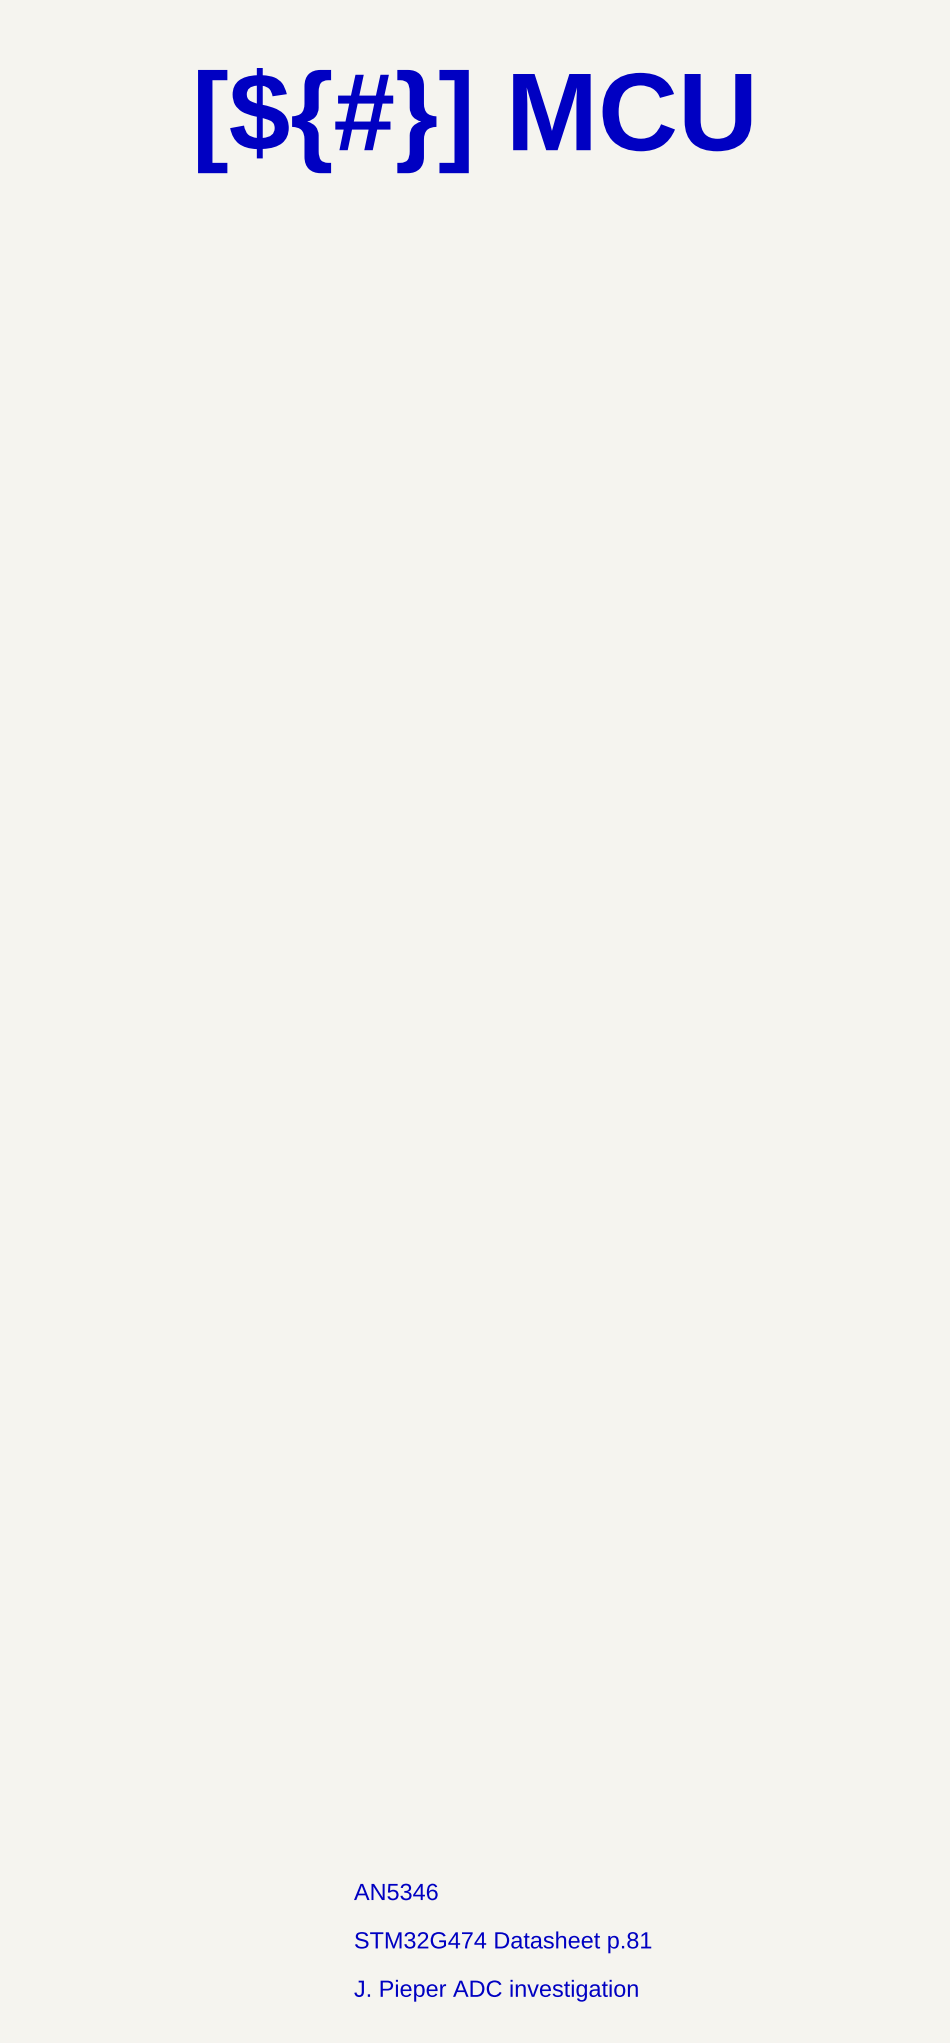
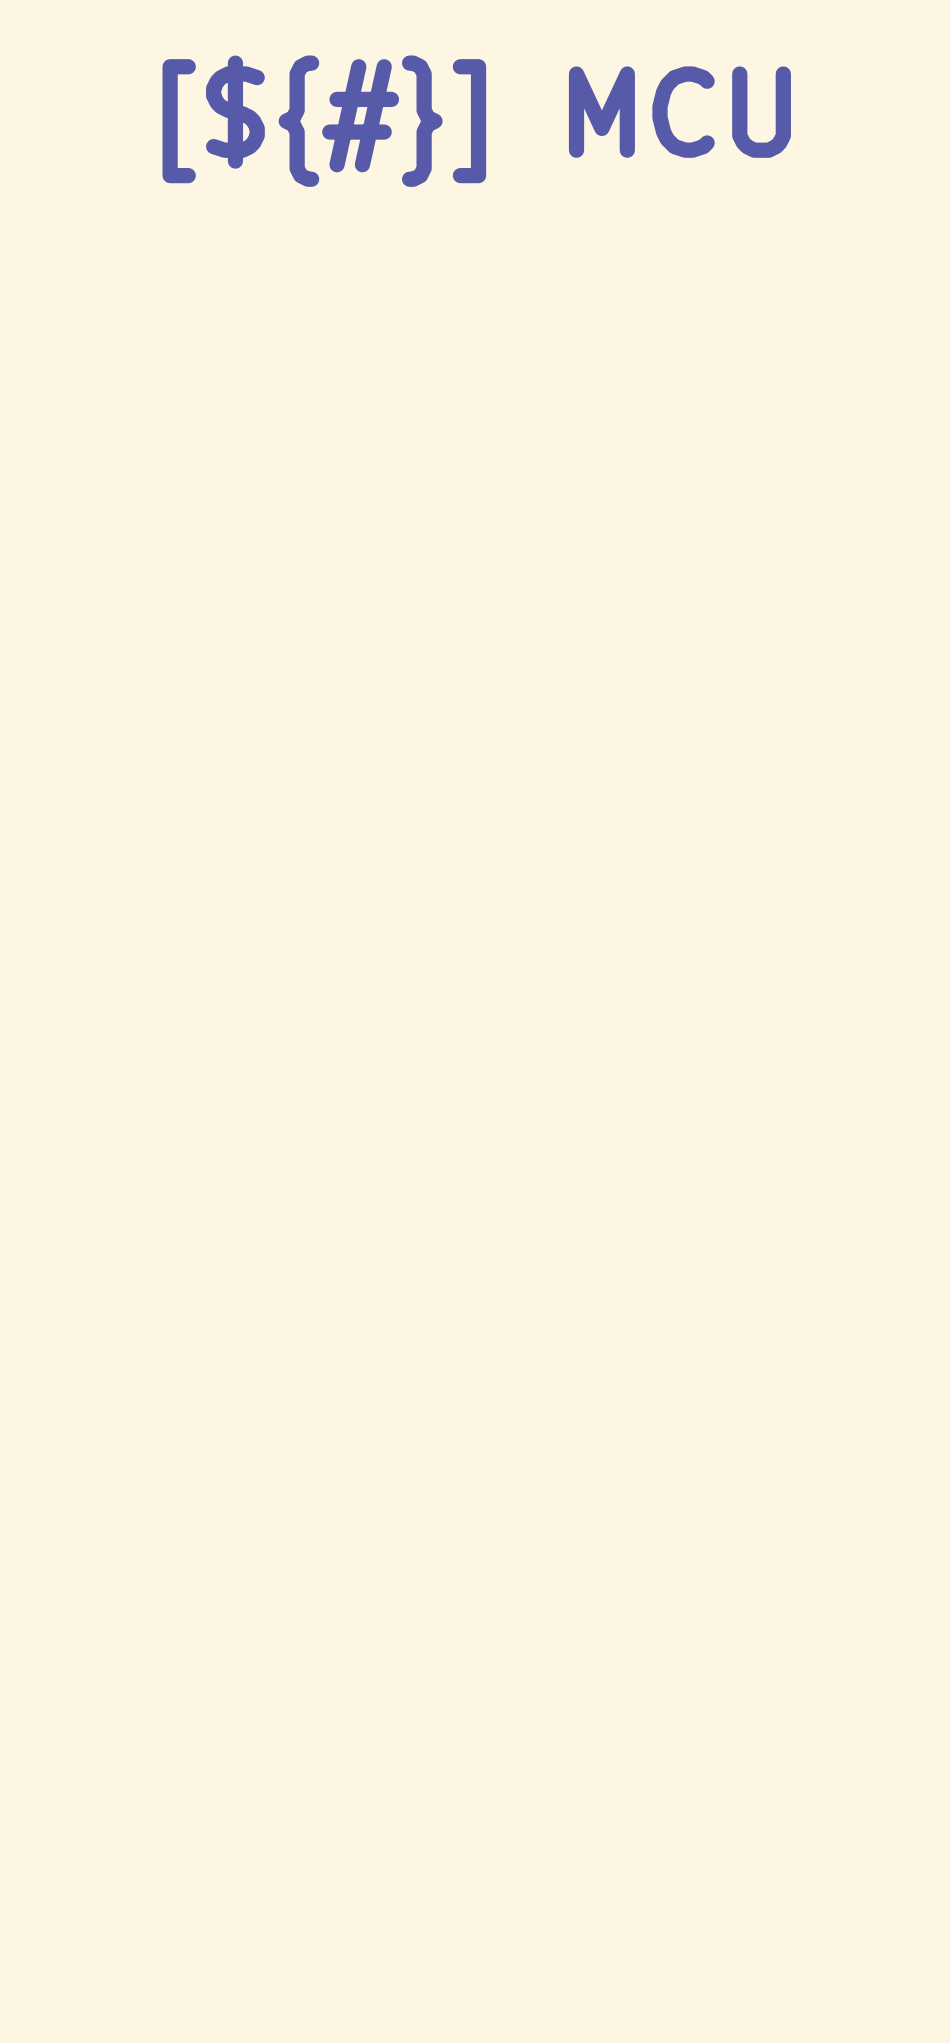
text: AN5346 (395, 1891) -> none
text: STM32G474 Datasheet p.81 (503, 1942) -> none
text: J. Pieper ADC investigation (496, 1990) -> none

